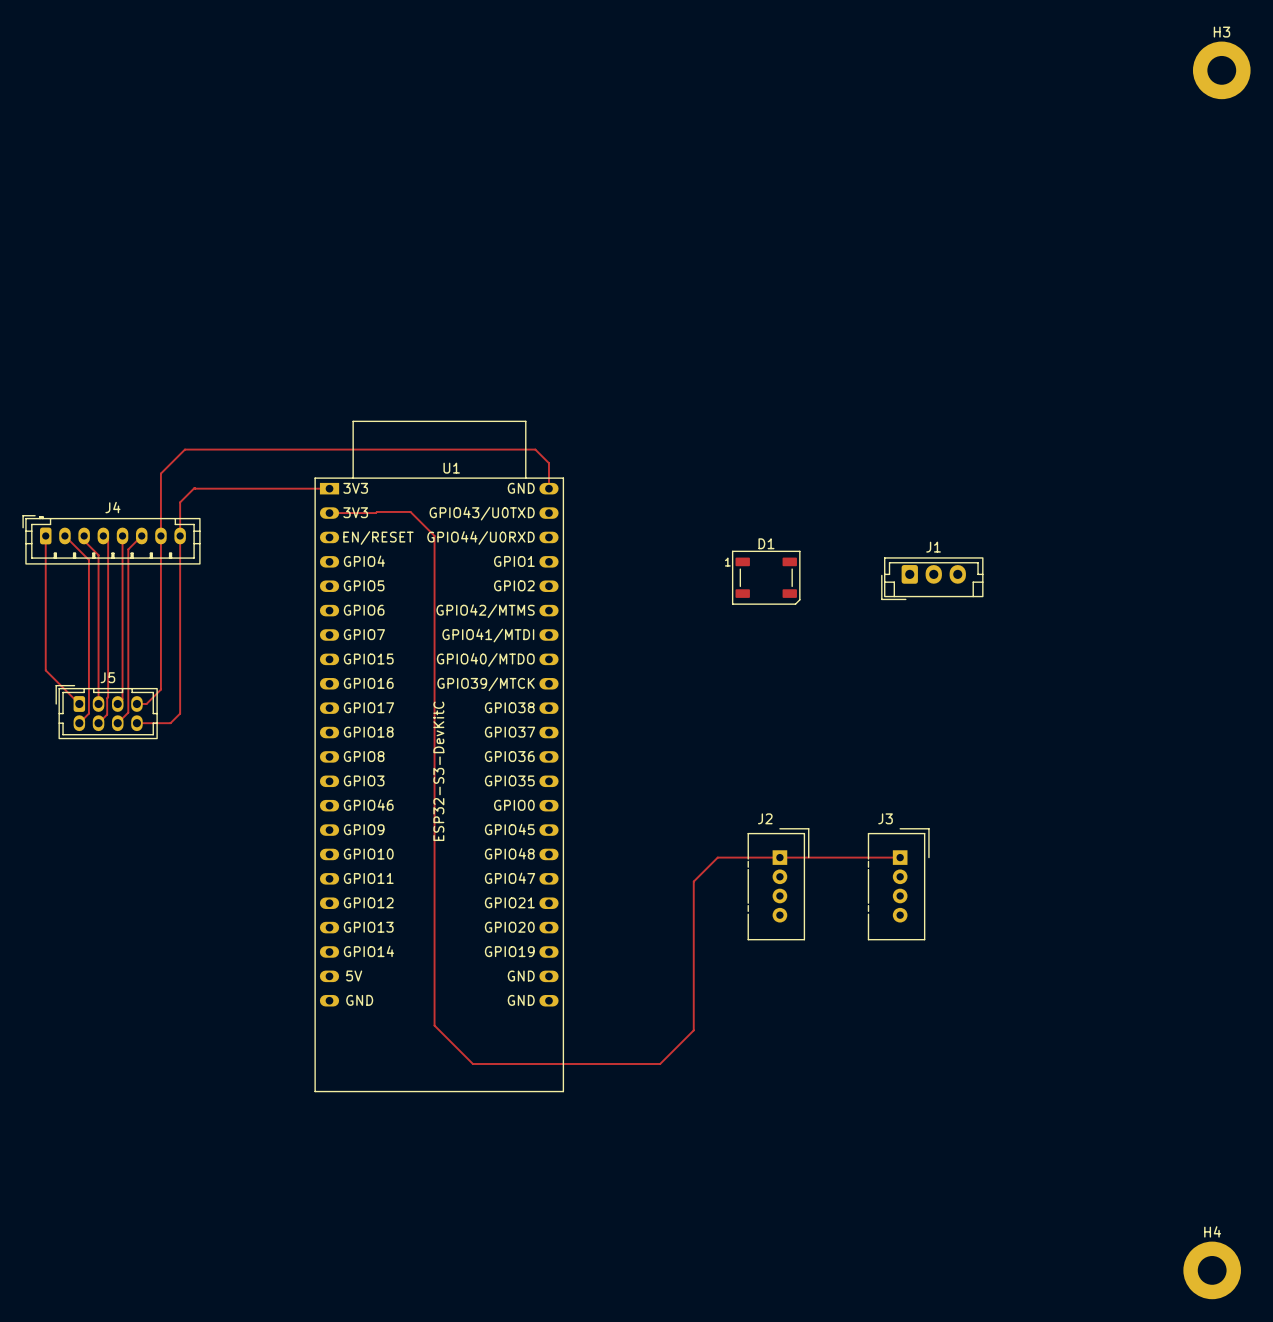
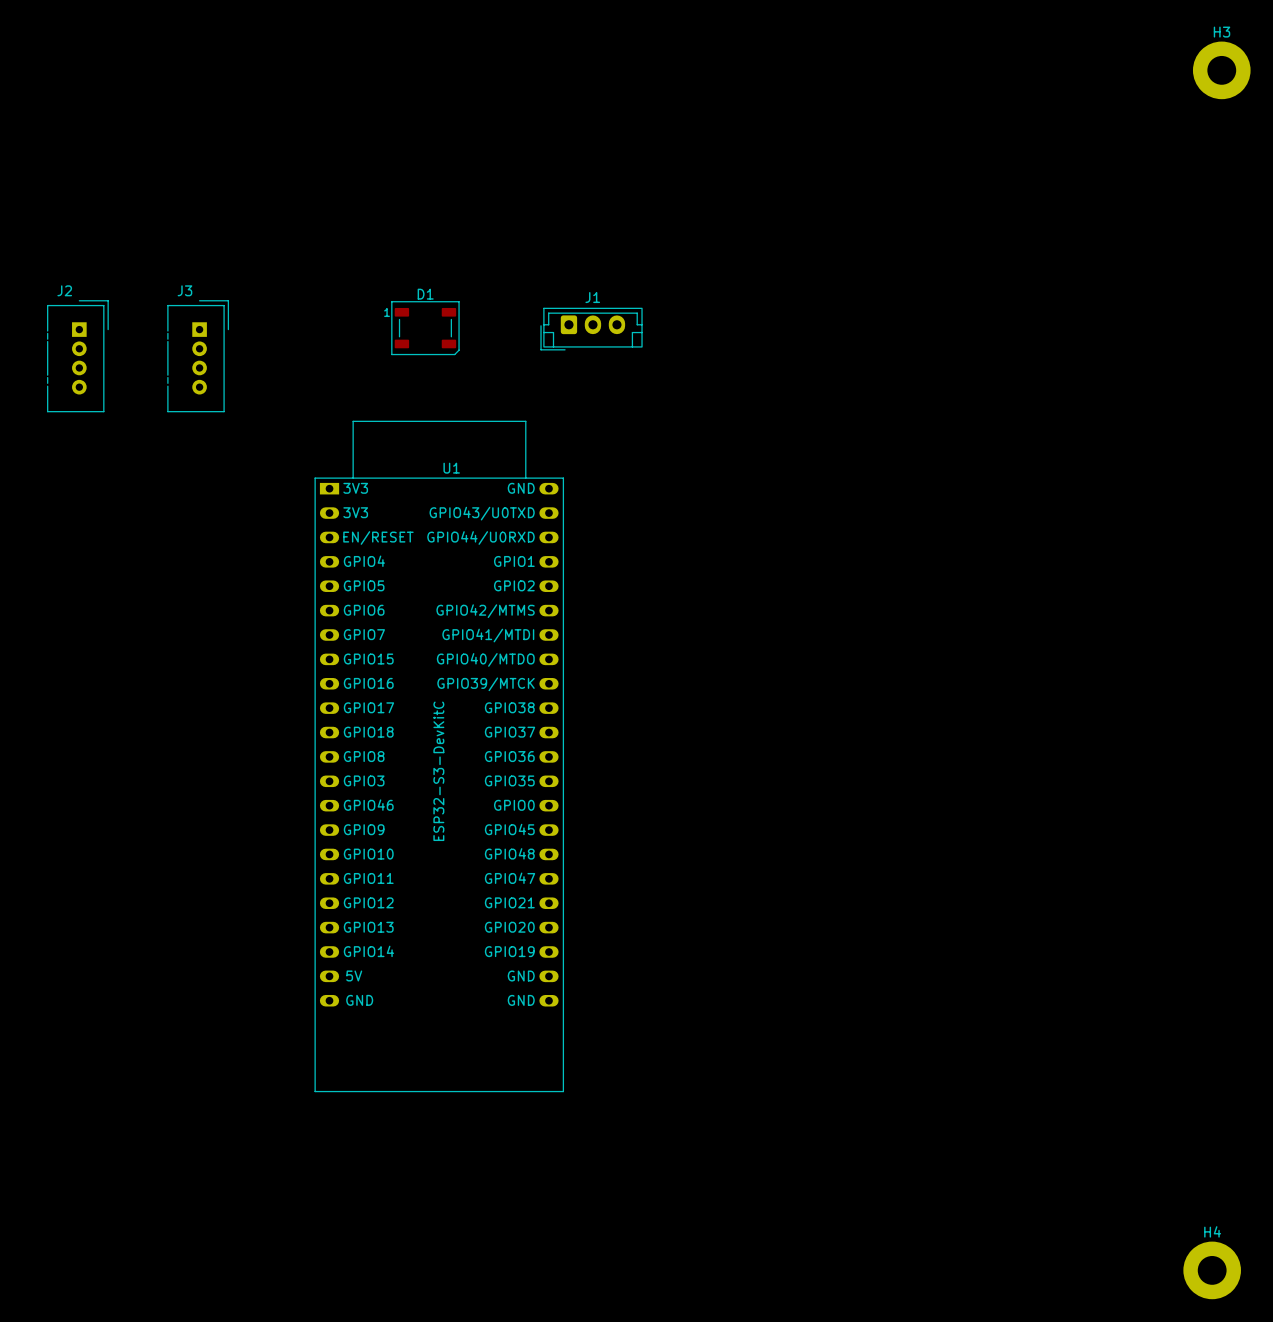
track: (329, 488) (194, 487) (180, 502) (180, 713) (170, 723) (136, 723) -> none
track: (548, 488) (548, 463) (535, 449) (184, 449) (160, 473) (160, 689) (146, 703) (136, 703) -> none
track: (329, 513) (410, 511) (434, 535) (434, 1025) (472, 1063) (660, 1063) (693, 1030) (693, 881) (717, 857) (900, 857) -> none
track: (45, 535) (45, 670) (79, 703) -> none
track: (64, 535) (88, 559) (88, 713) (79, 723) -> none
track: (84, 535) (84, 540) (98, 555) (98, 703) -> none
track: (103, 535) (108, 540) (108, 697) (107, 714) (98, 723) -> none
track: (122, 535) (122, 699) (117, 703) -> none
track: (141, 535) (128, 549) (128, 712) (117, 723) -> none
J4: (111, 539) -> none
D1 position: (766, 577) -> (425, 328)
J1 position: (932, 578) -> (591, 329)
J5: (106, 712) -> none
J2 position: (778, 884) -> (77, 356)
J3 position: (898, 884) -> (198, 356)

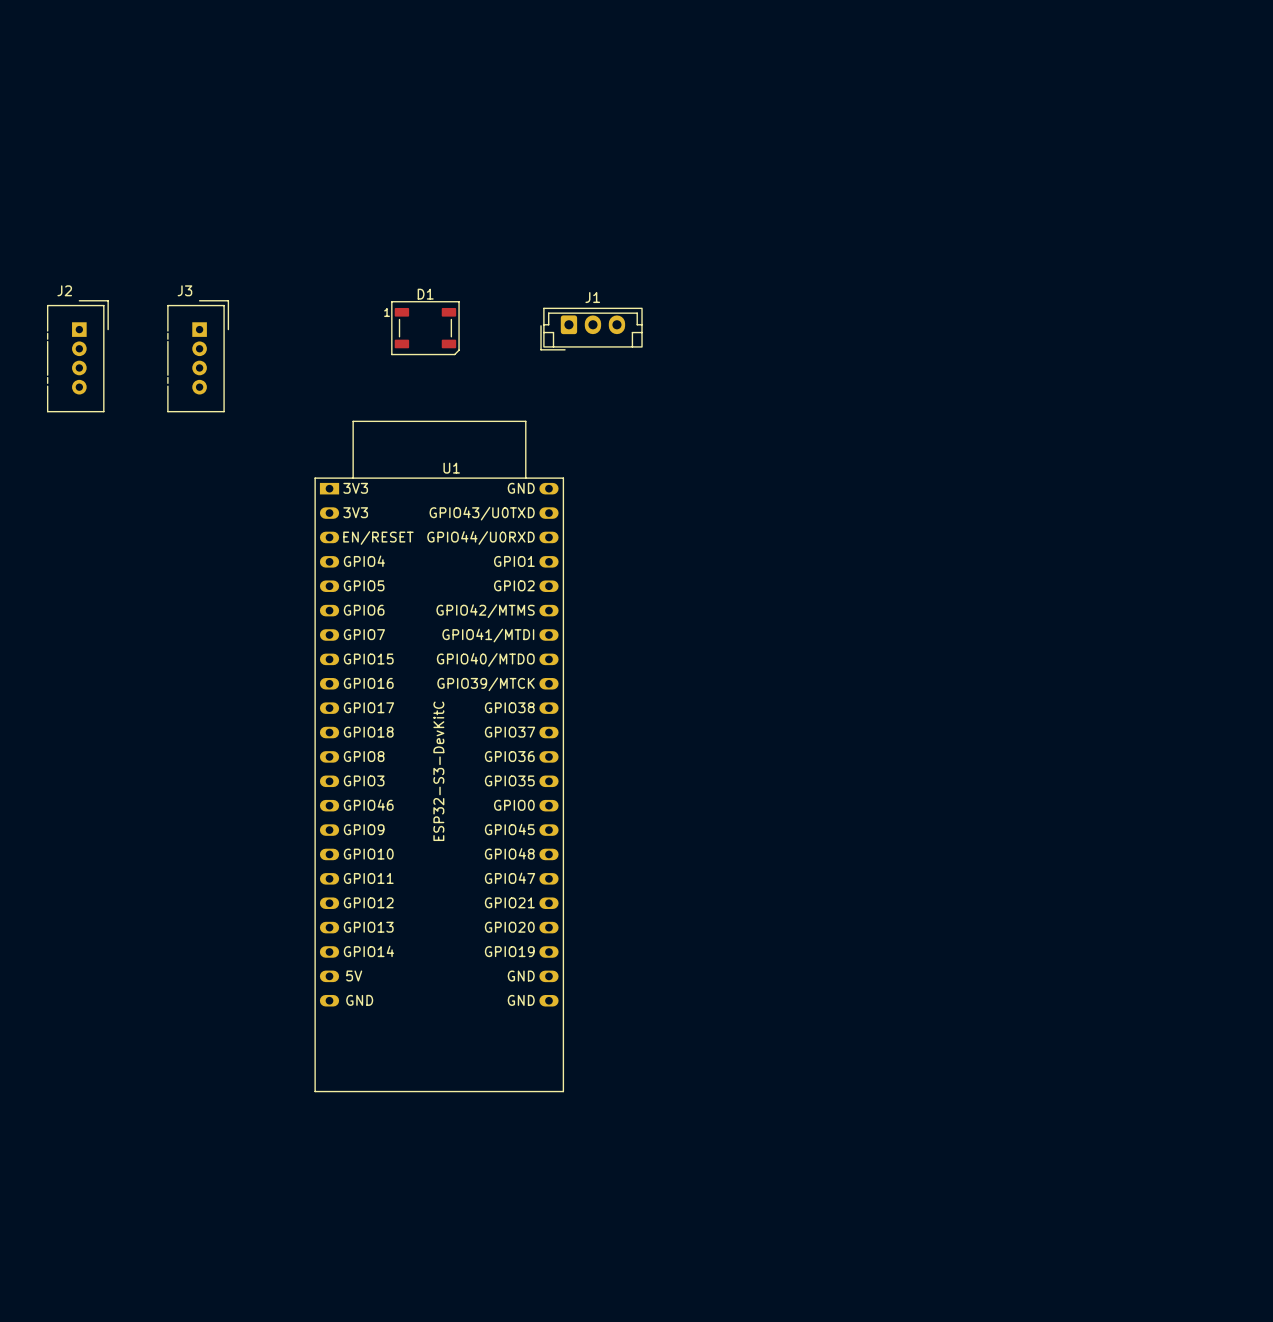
H3: (1221, 70) -> none
H4: (1212, 1270) -> none

